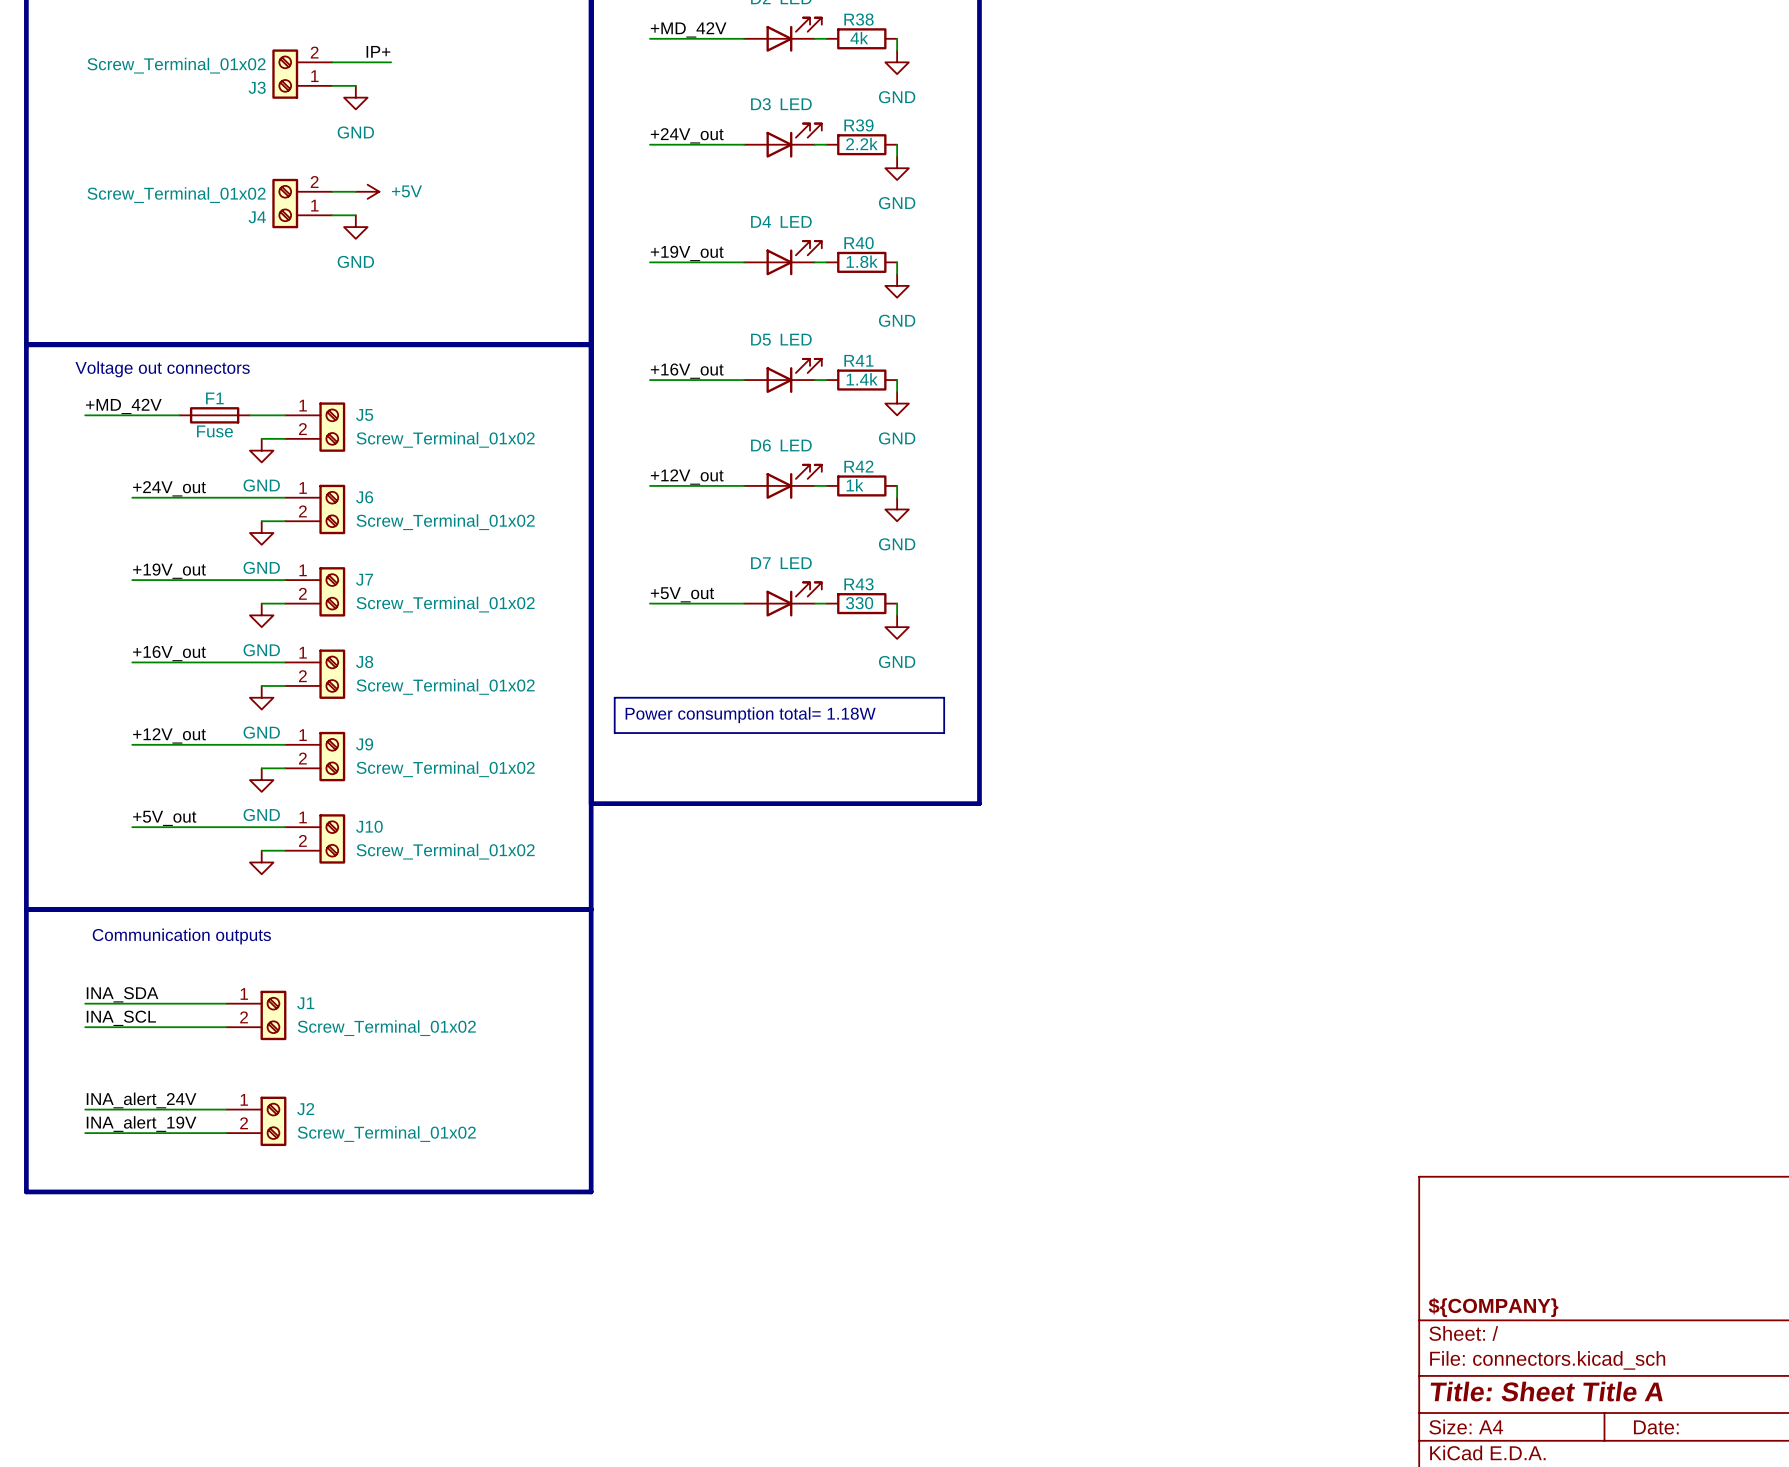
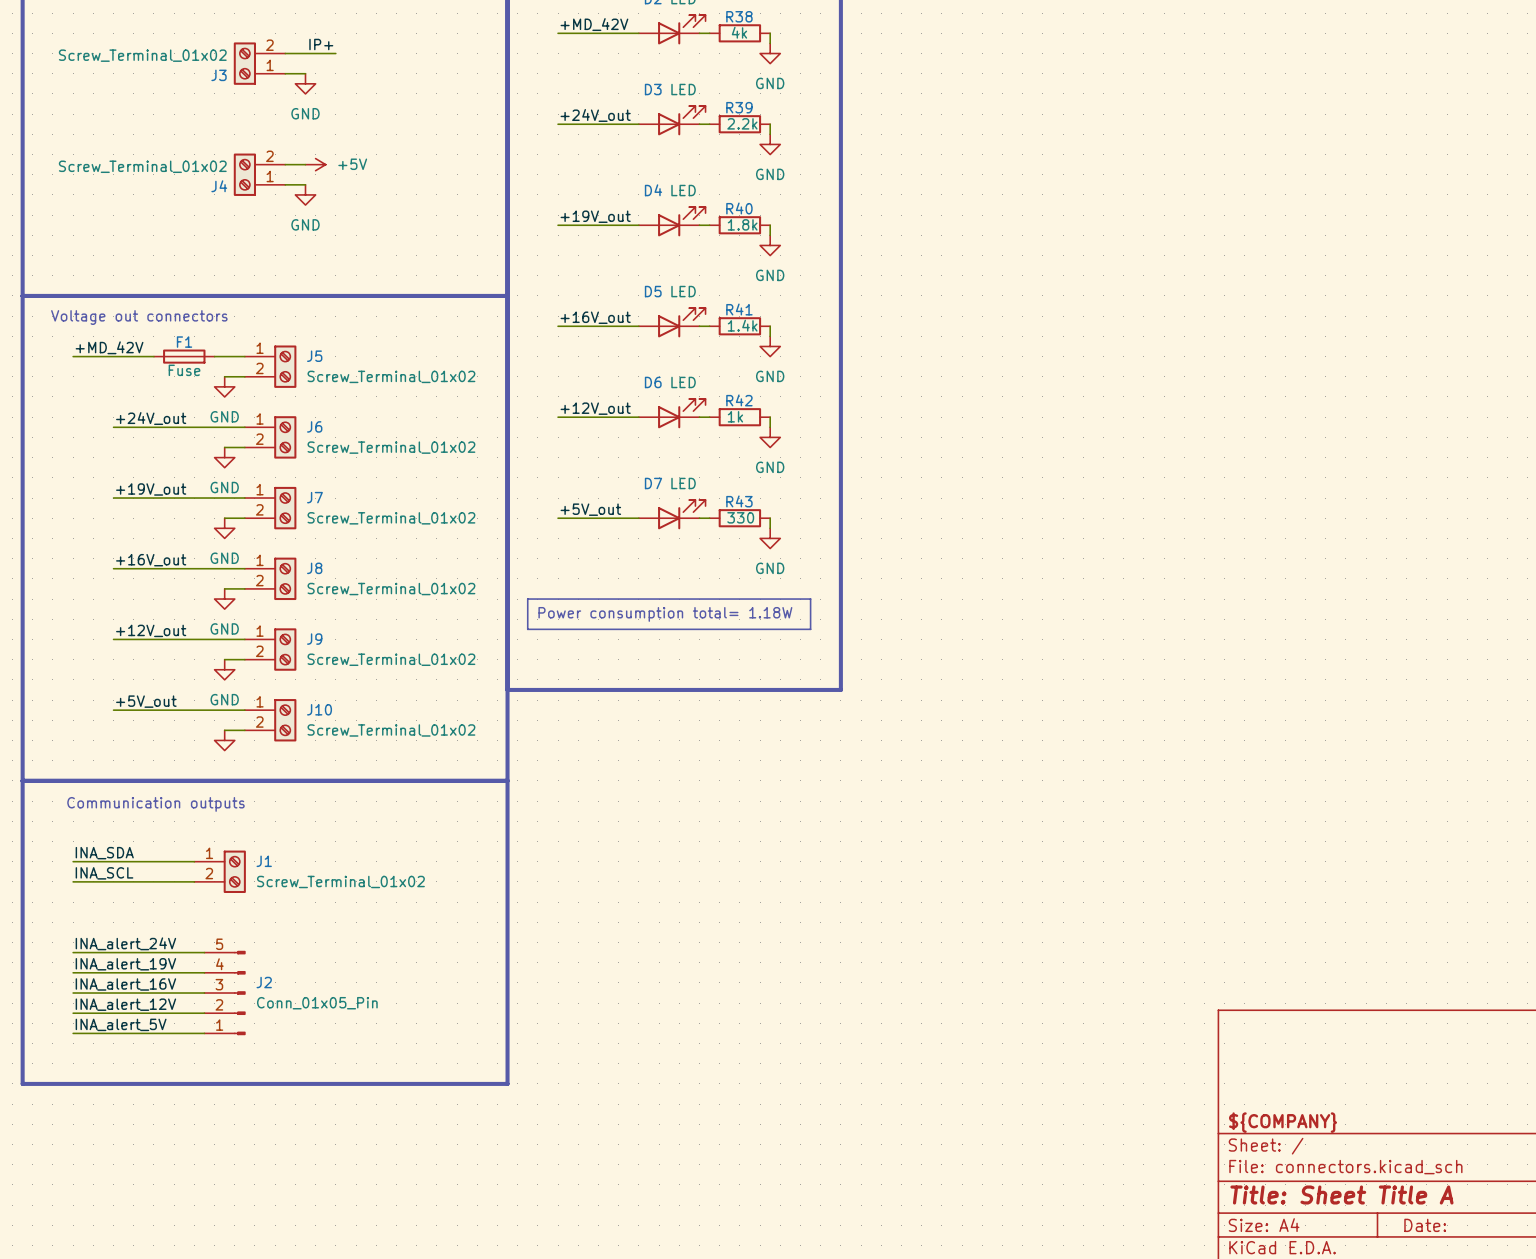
J2 symbol: [226, 1096, 287, 1147] -> [204, 950, 246, 1036]
J2 value: Screw_Terminal_01x02 (386, 1134) -> Conn_01x05_Pin (317, 1003)
label: none -> INA_alert_16V (125, 984)
wire: none -> (73, 993) (204, 993)
label: none -> INA_alert_12V (125, 1004)
wire: none -> (73, 1013) (204, 1013)
line: (26, 1191) (591, 1191) -> (22, 1023) (22, 1083) (507, 1083) (507, 1023)
label: none -> INA_alert_5V (121, 1024)
wire: none -> (73, 1033) (204, 1033)

